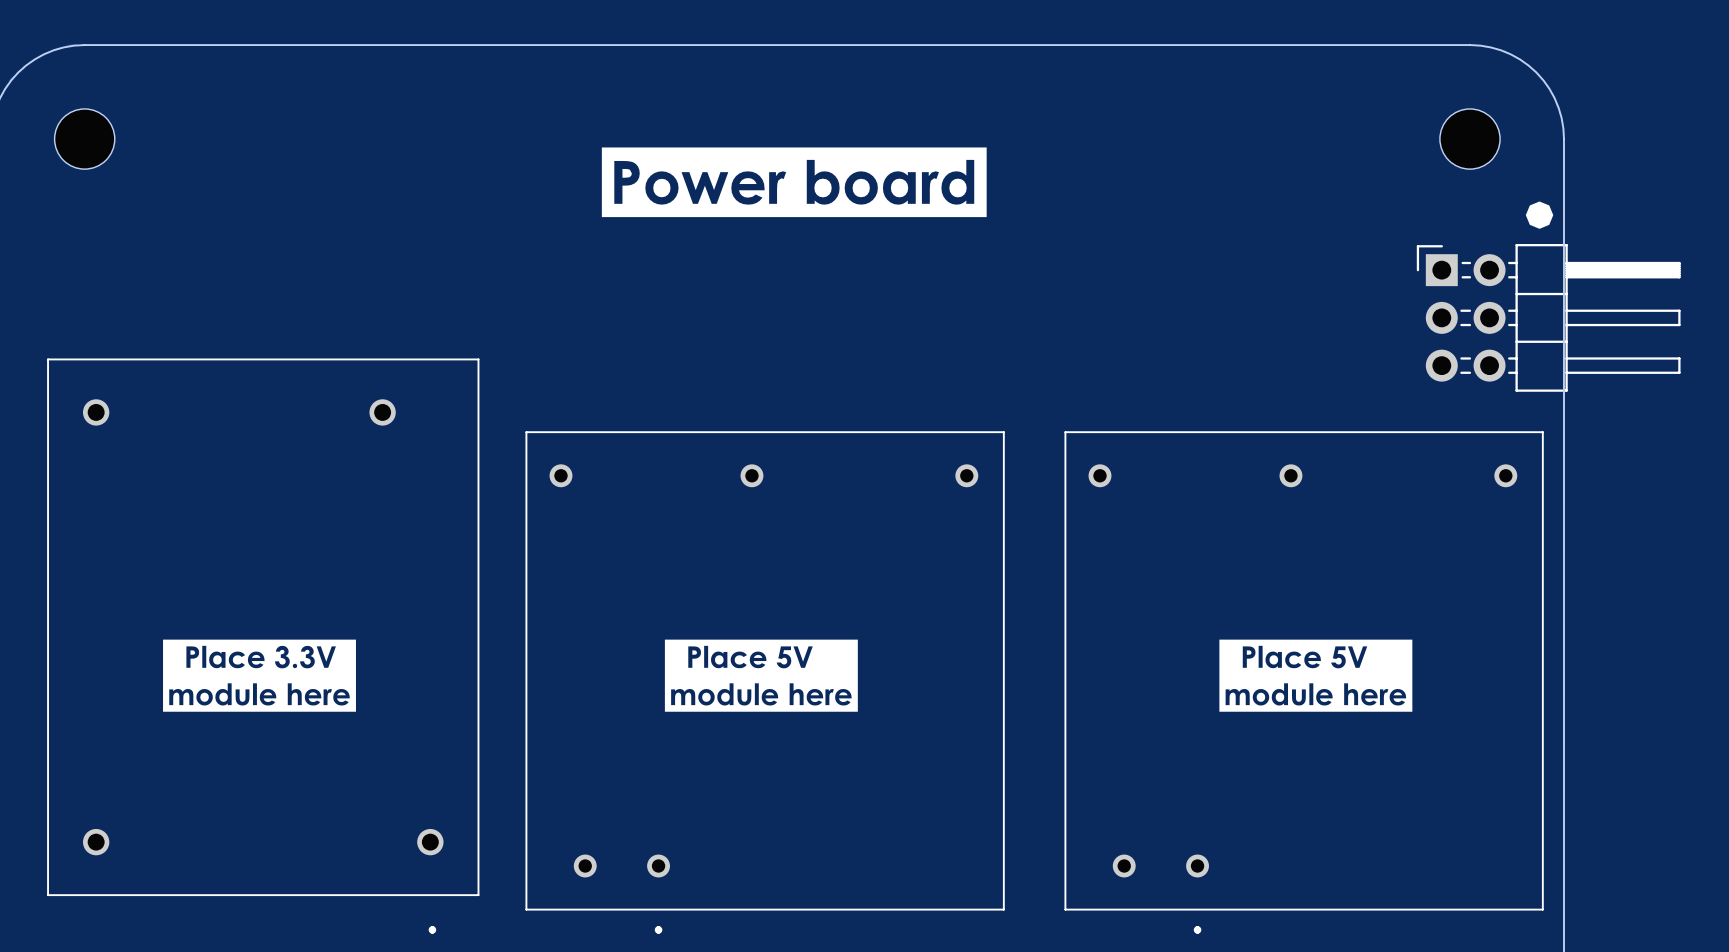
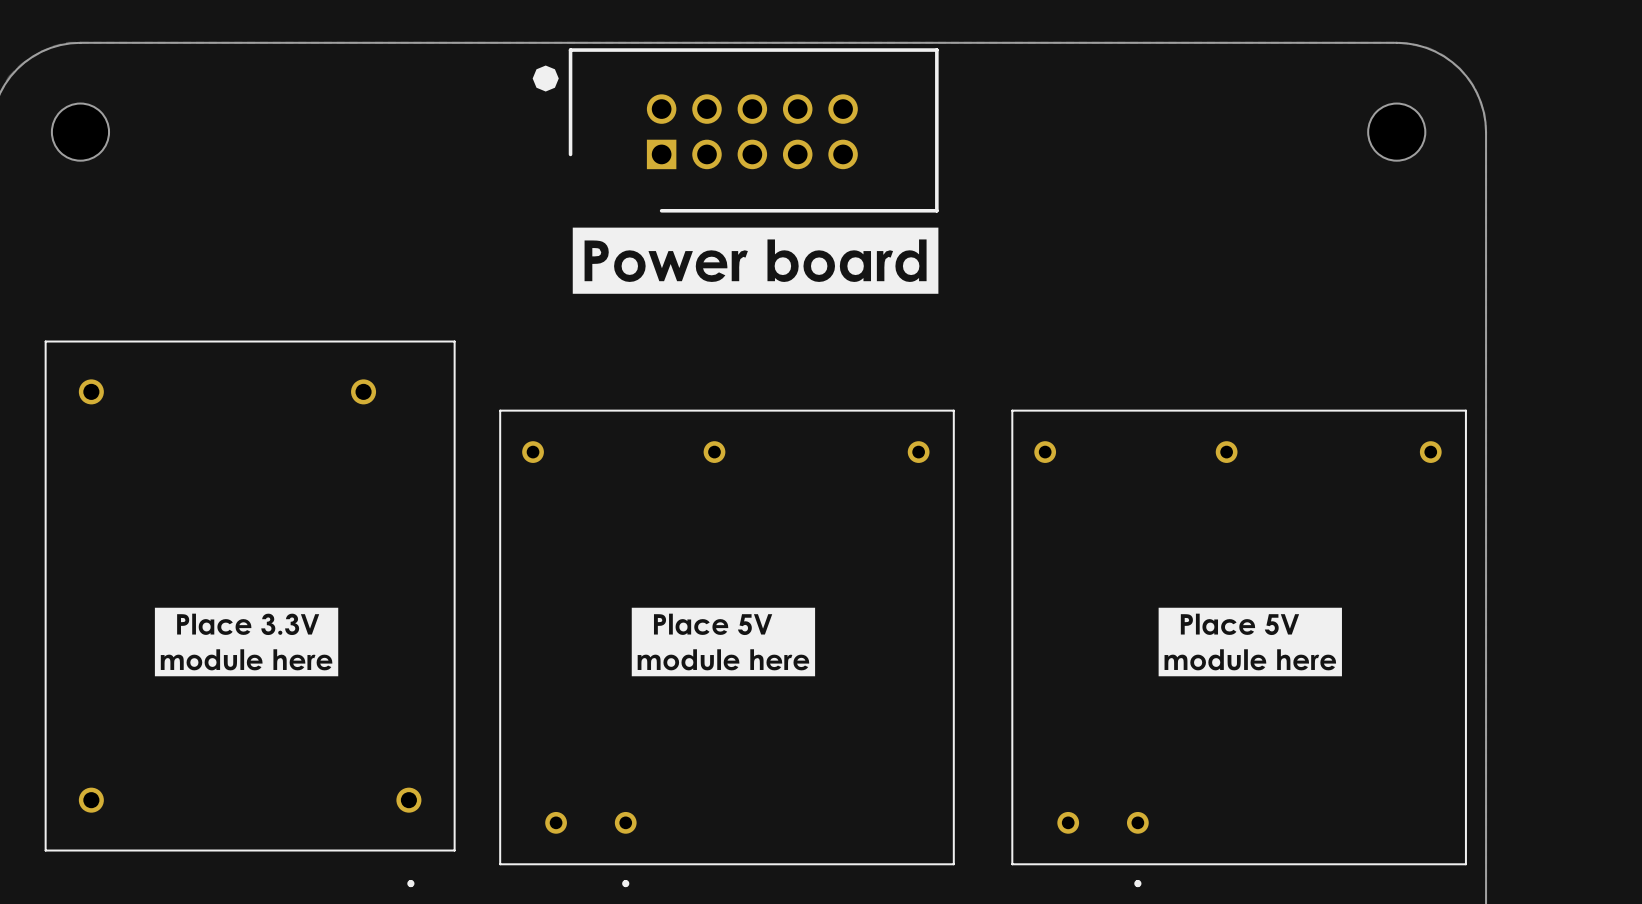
drawing: none -> [532, 65, 559, 92]
part: none -> (753, 130)
drawing position: (794, 182) -> (755, 260)
drawing: [1525, 201, 1554, 229] -> none
part: (1548, 317) -> none

